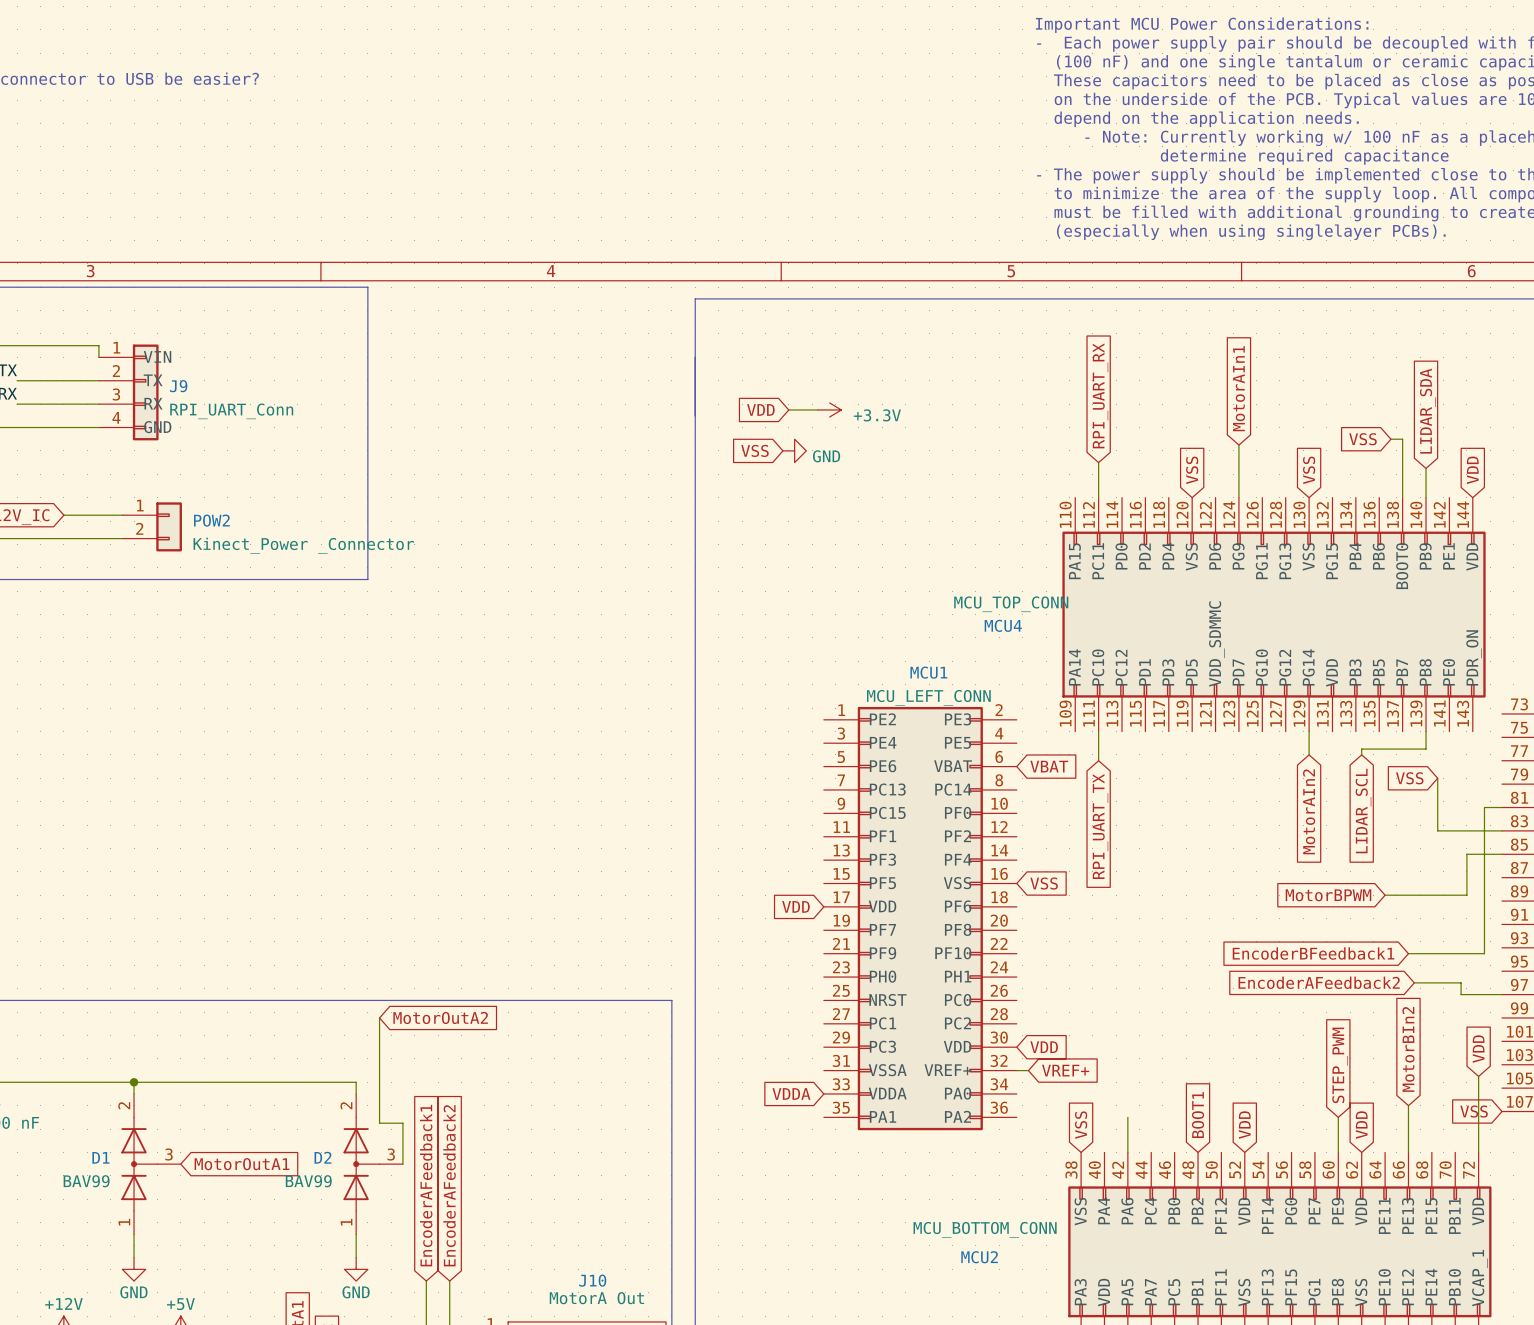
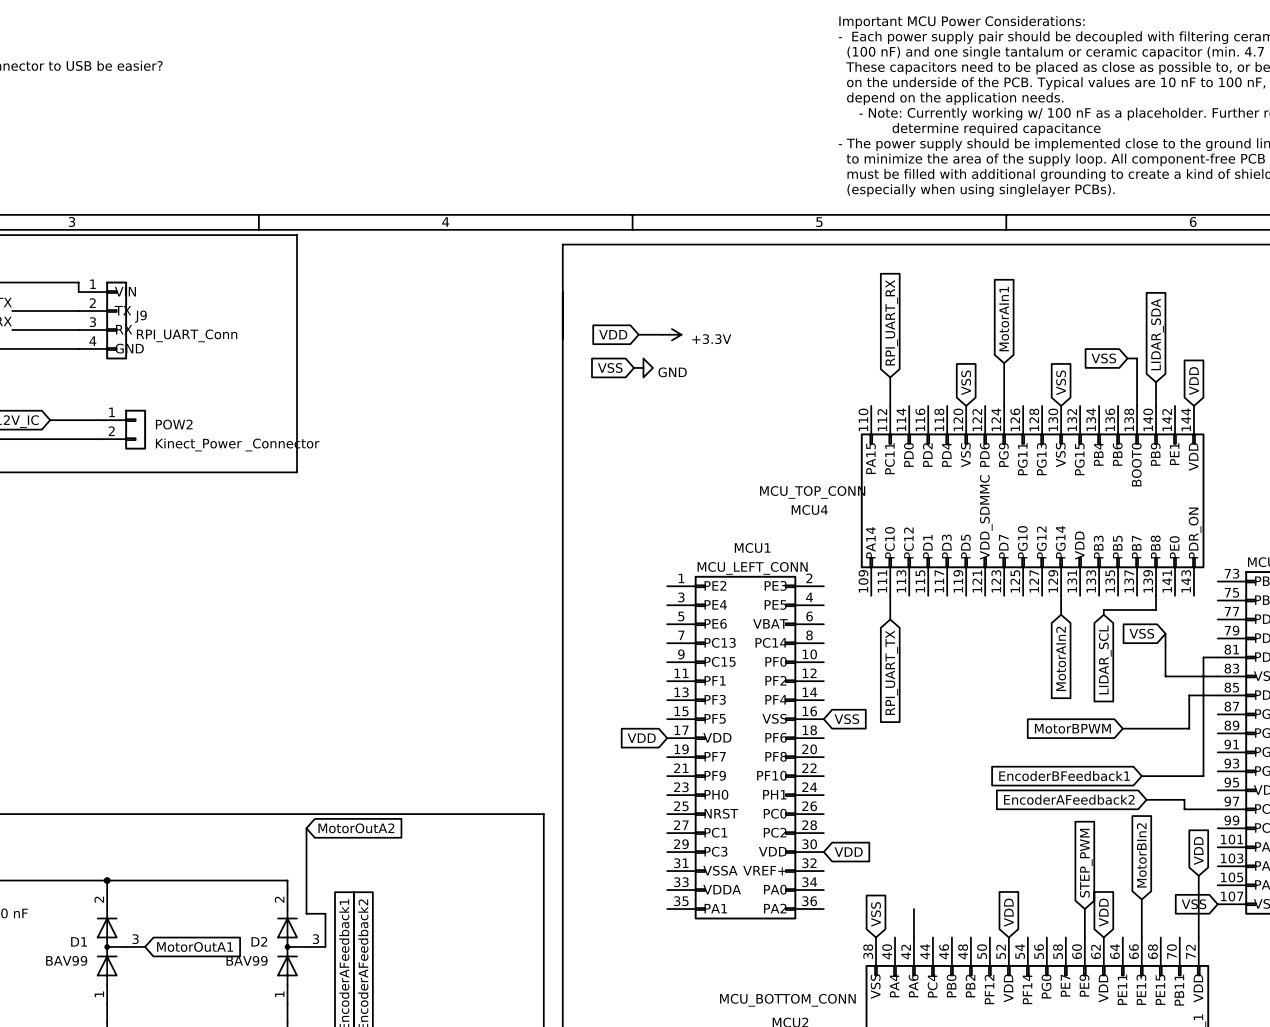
global label: VBAT (1049, 766) -> none
wire: (1016, 1070) (1028, 1070) -> none
global label: VREF+ (1065, 1070) -> none
global label: VDDA (791, 1093) -> none
global label: BOOT1 (1198, 1115) -> none

